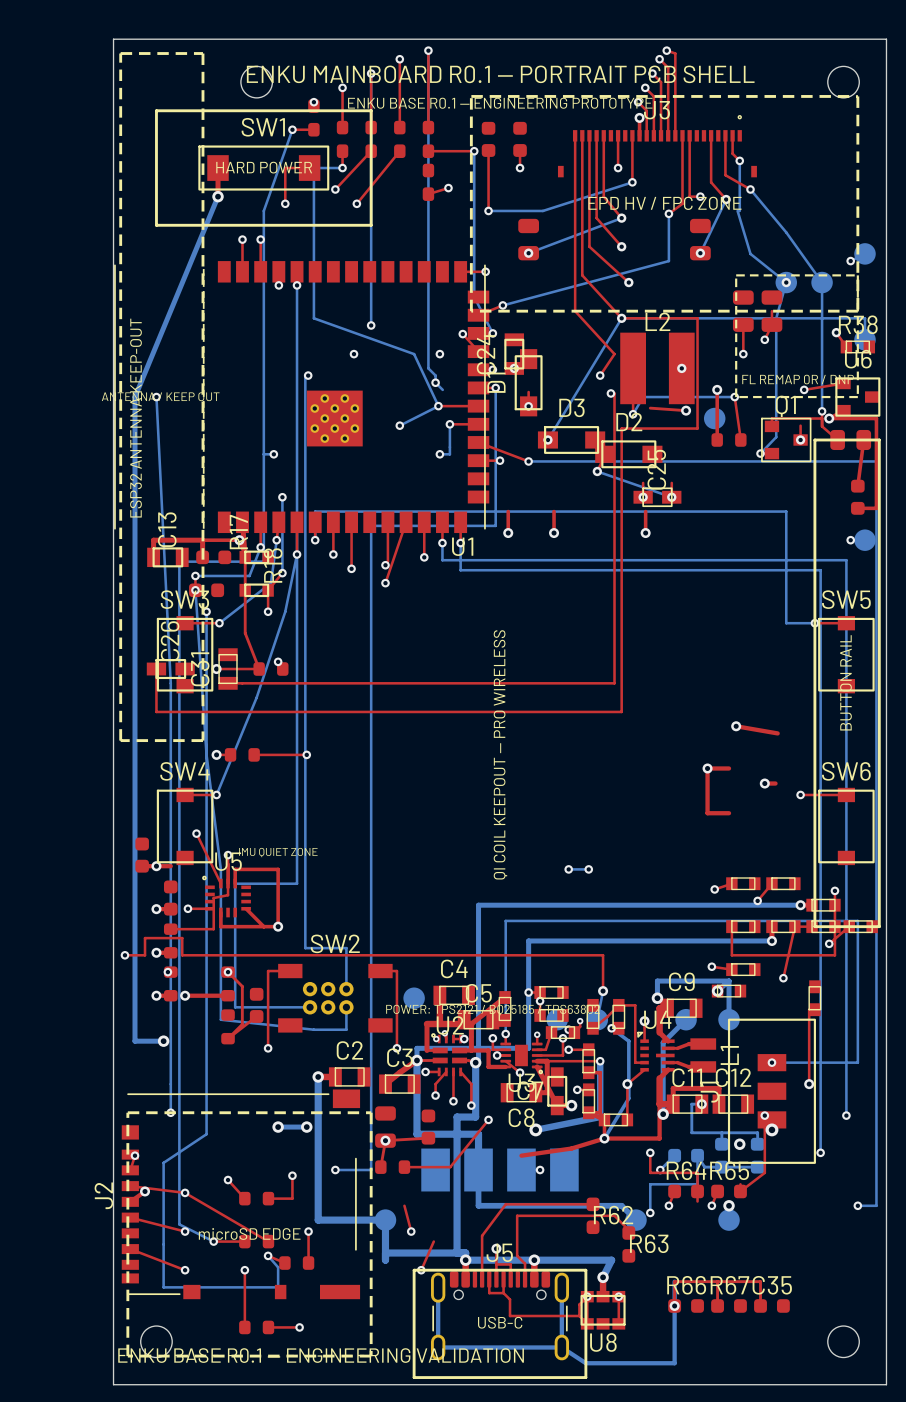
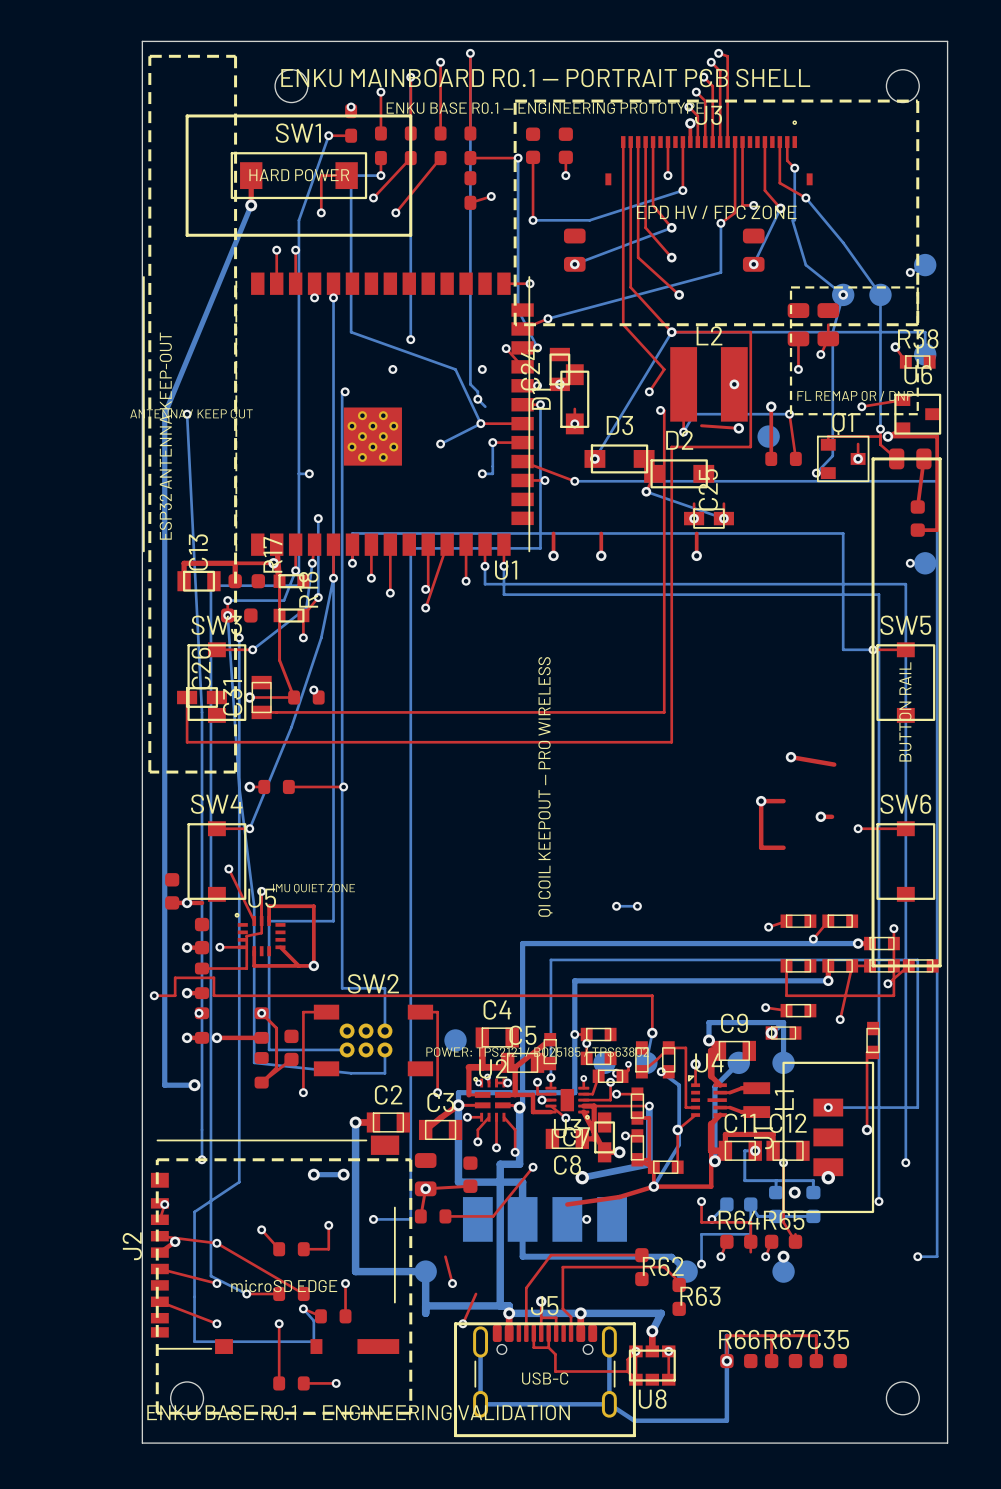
top track: (764, 1115) (764, 1172) (740, 1191) -> (783, 1162) (783, 1222) (795, 1241)
via position: (764, 1115) -> (783, 1162)

